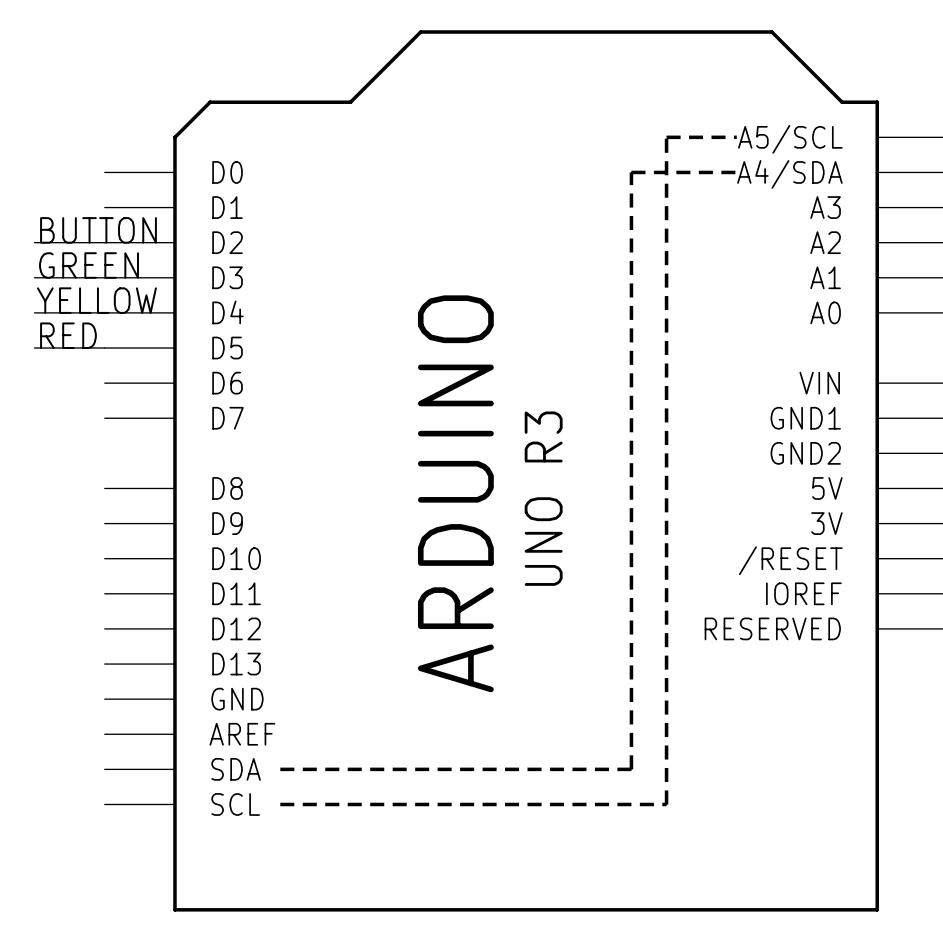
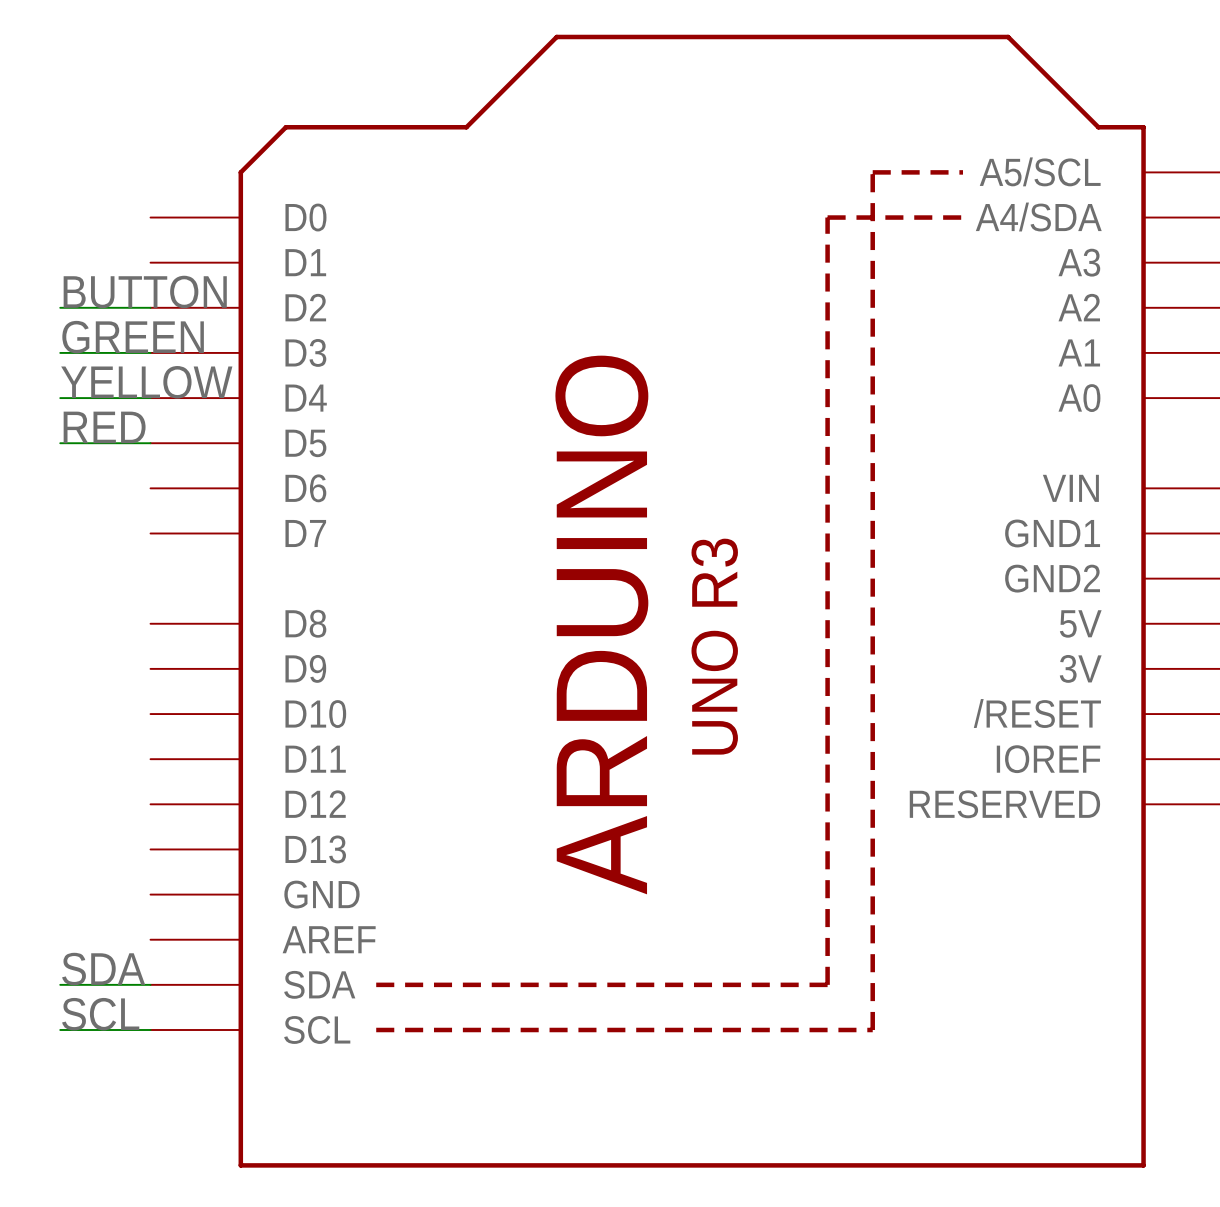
label: none -> SDA (103, 969)
wire: none -> (60, 984) (150, 984)
label: none -> SCL (100, 1014)
wire: none -> (60, 1030) (150, 1030)

